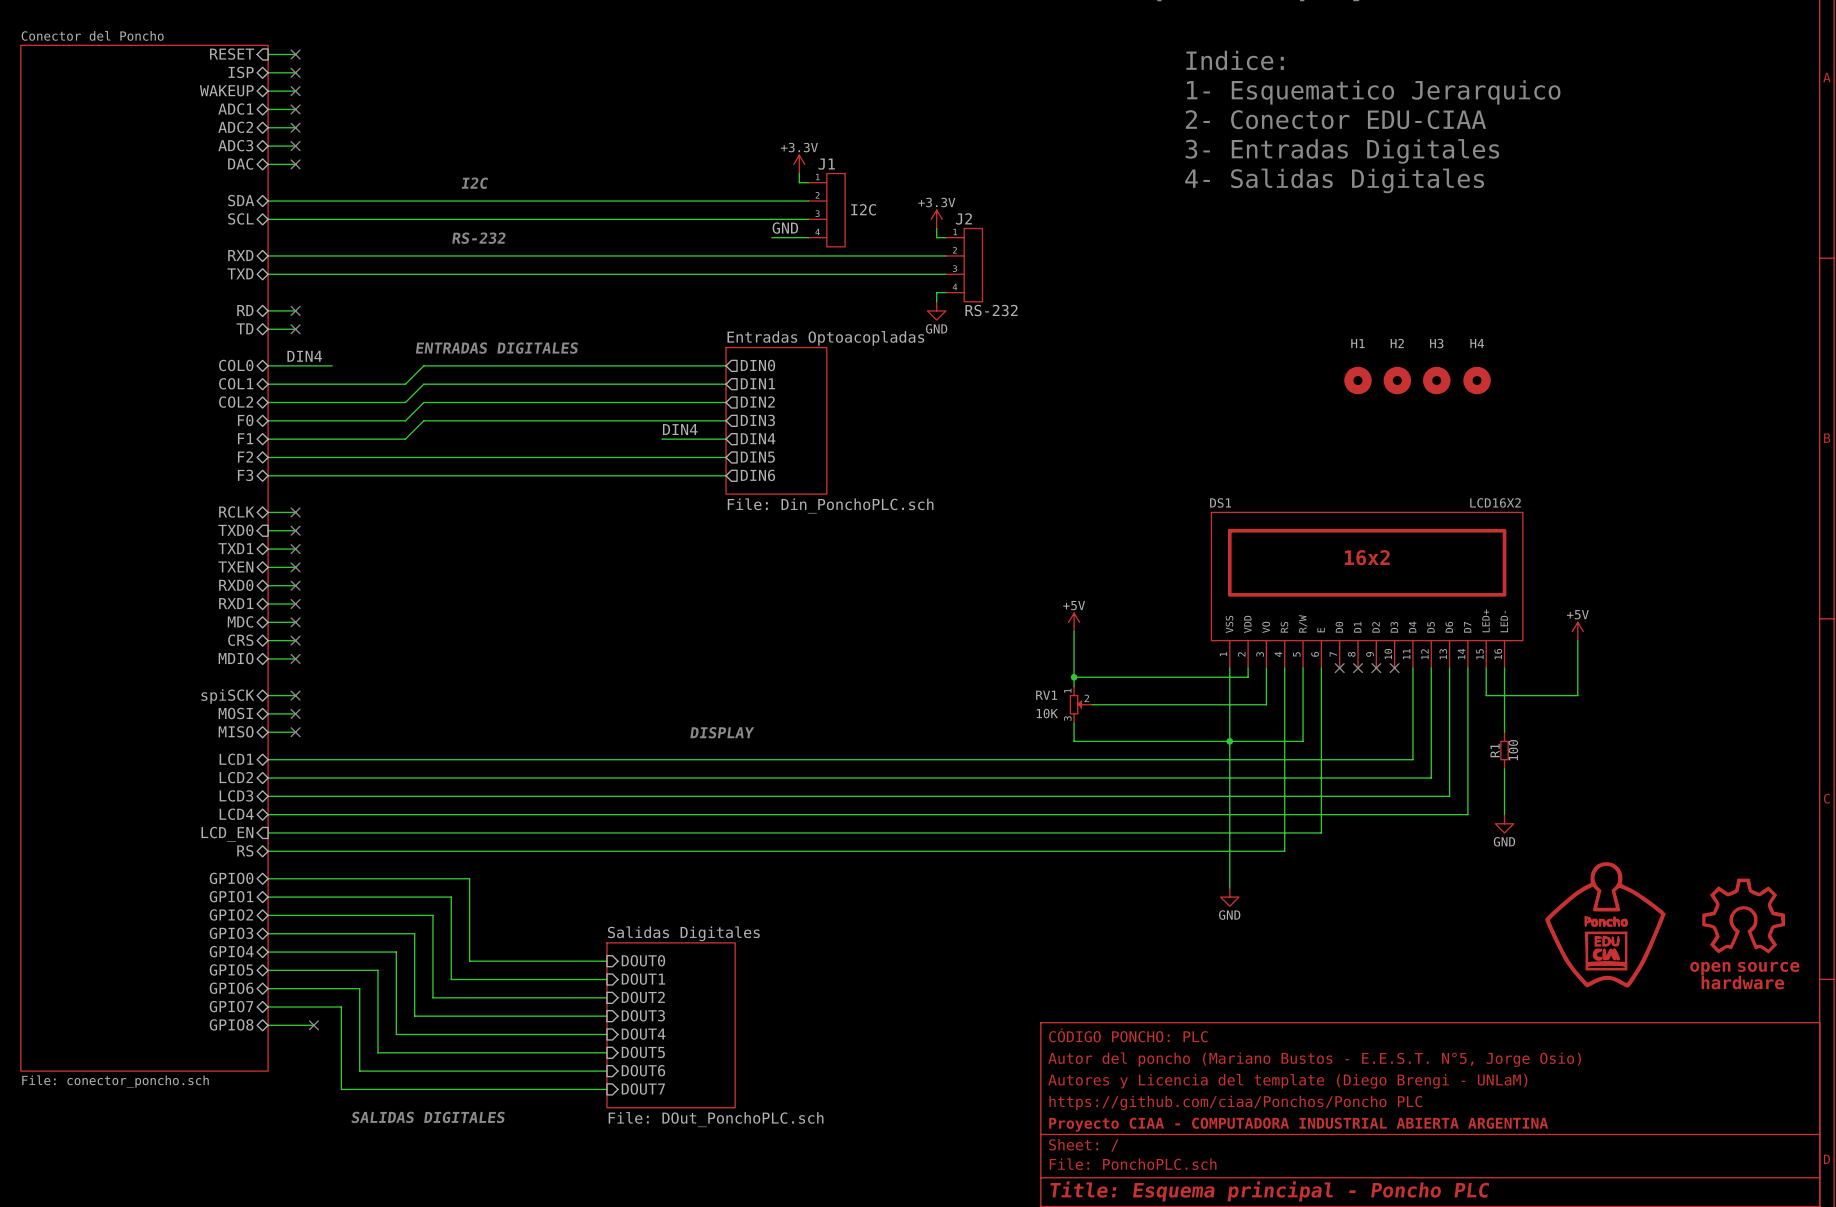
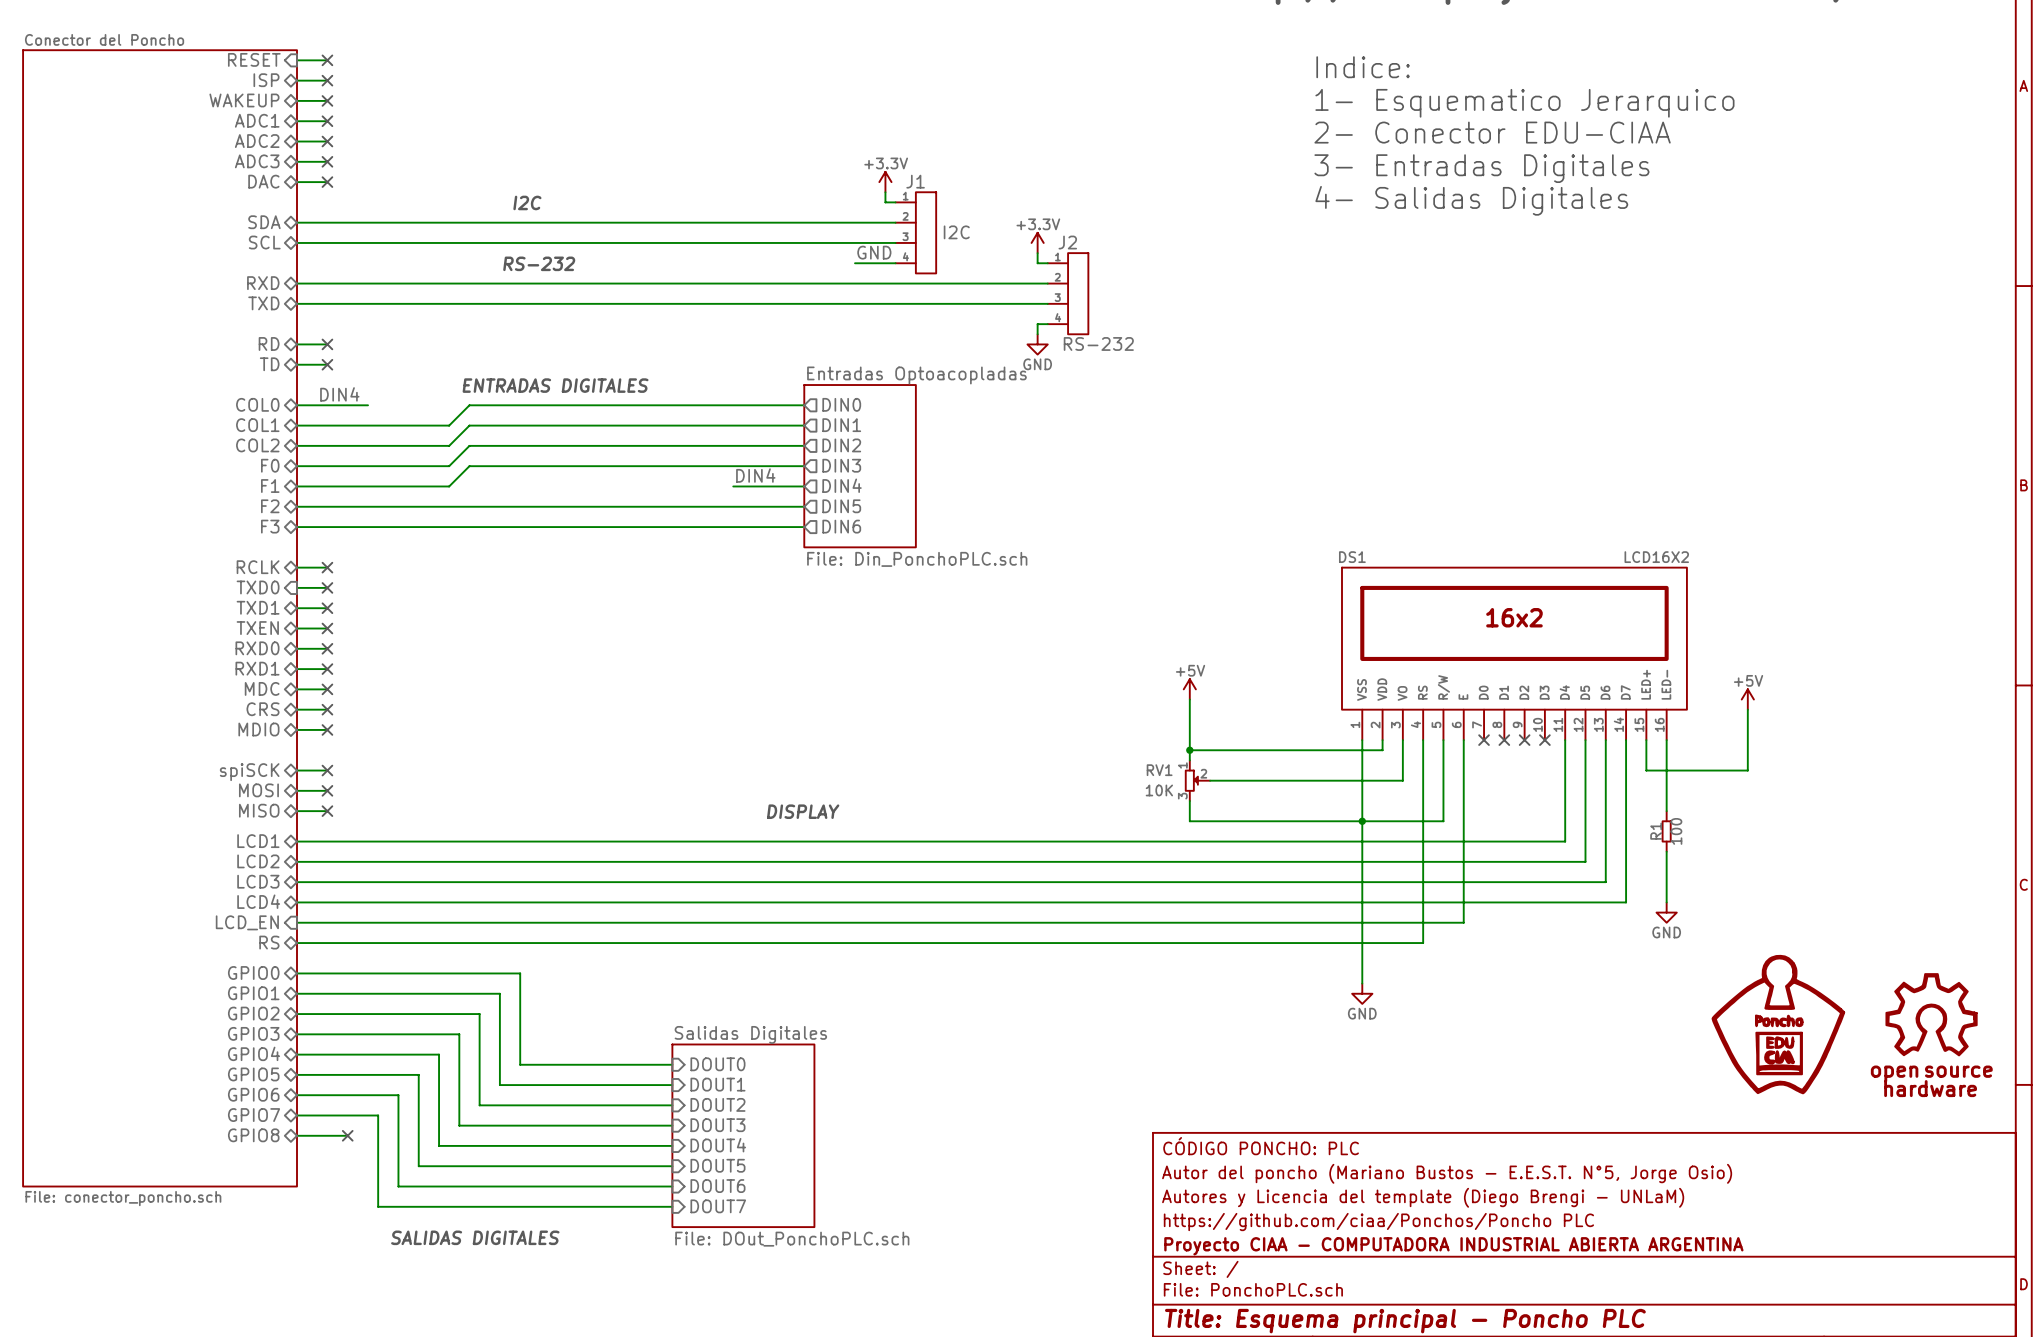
H1: (1357, 380) -> none
H2: (1397, 380) -> none
H3: (1436, 380) -> none
H4: (1477, 380) -> none

